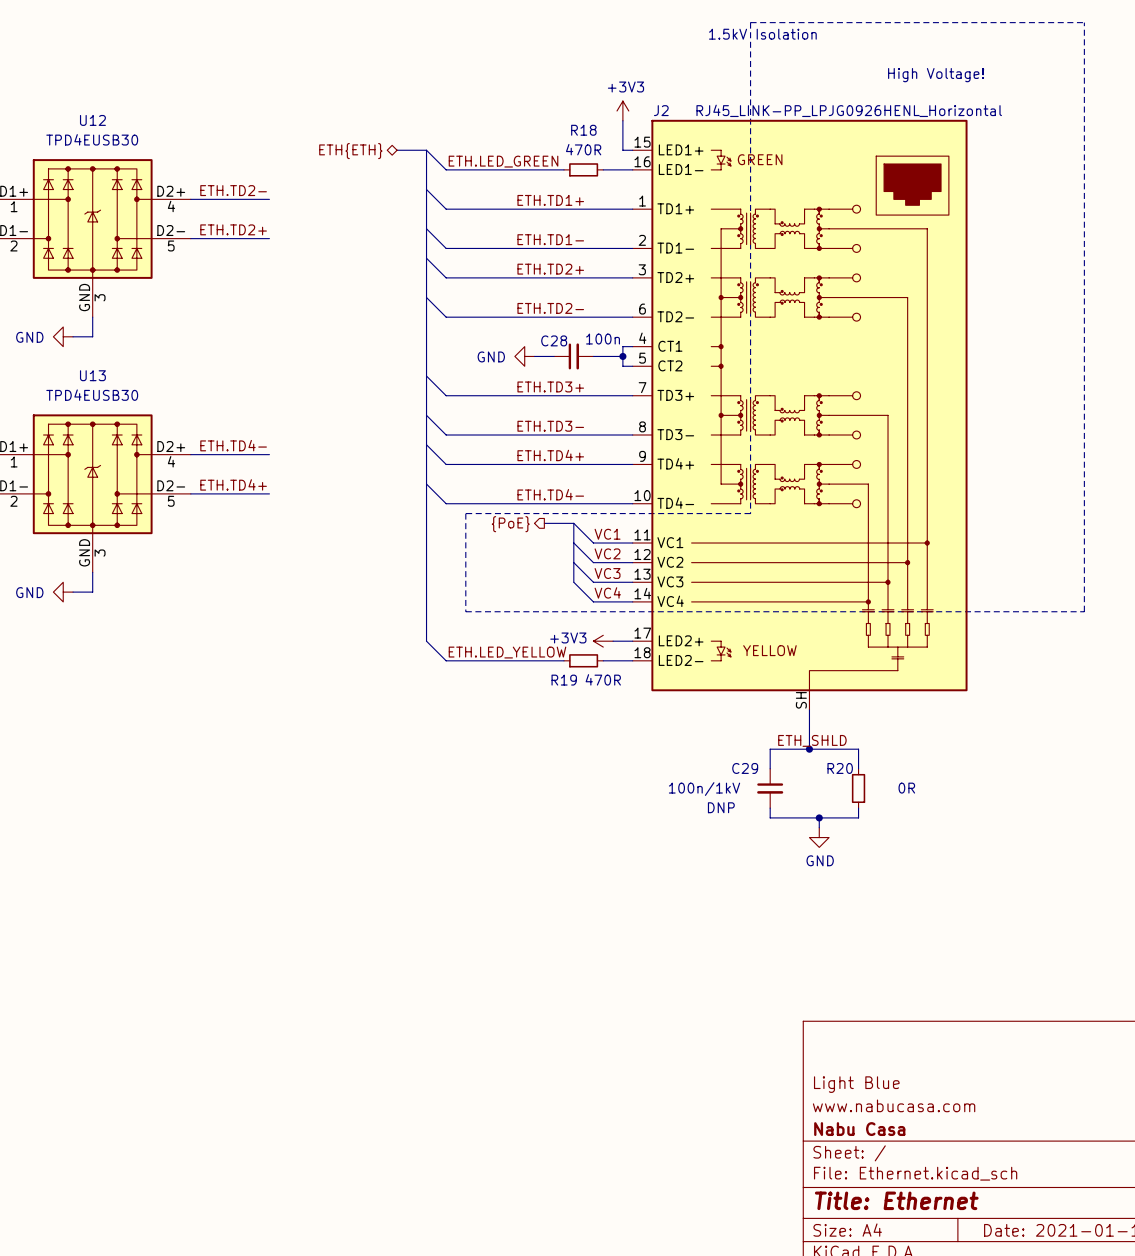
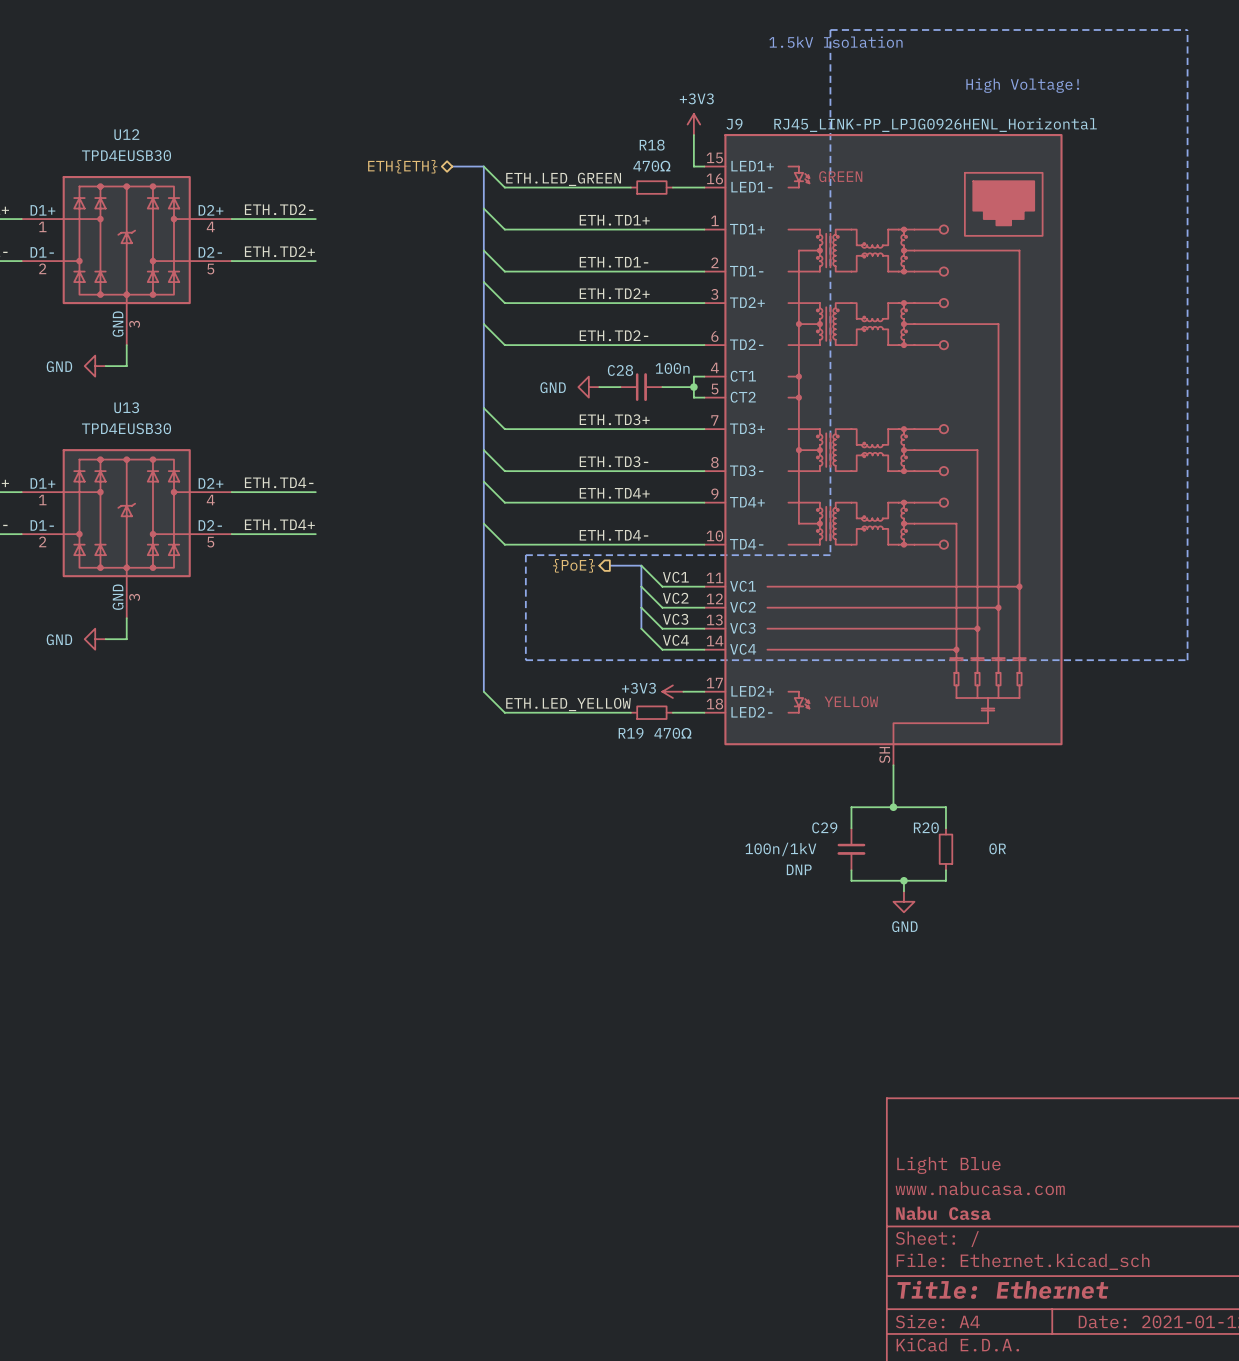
J2 name: J2 (661, 110) -> J9 (734, 124)
R18 value: 470R (583, 149) -> 470Ω (651, 166)
R19 value: 470R (603, 679) -> 470Ω (672, 733)
label: ETH_SHLD (812, 740) -> none

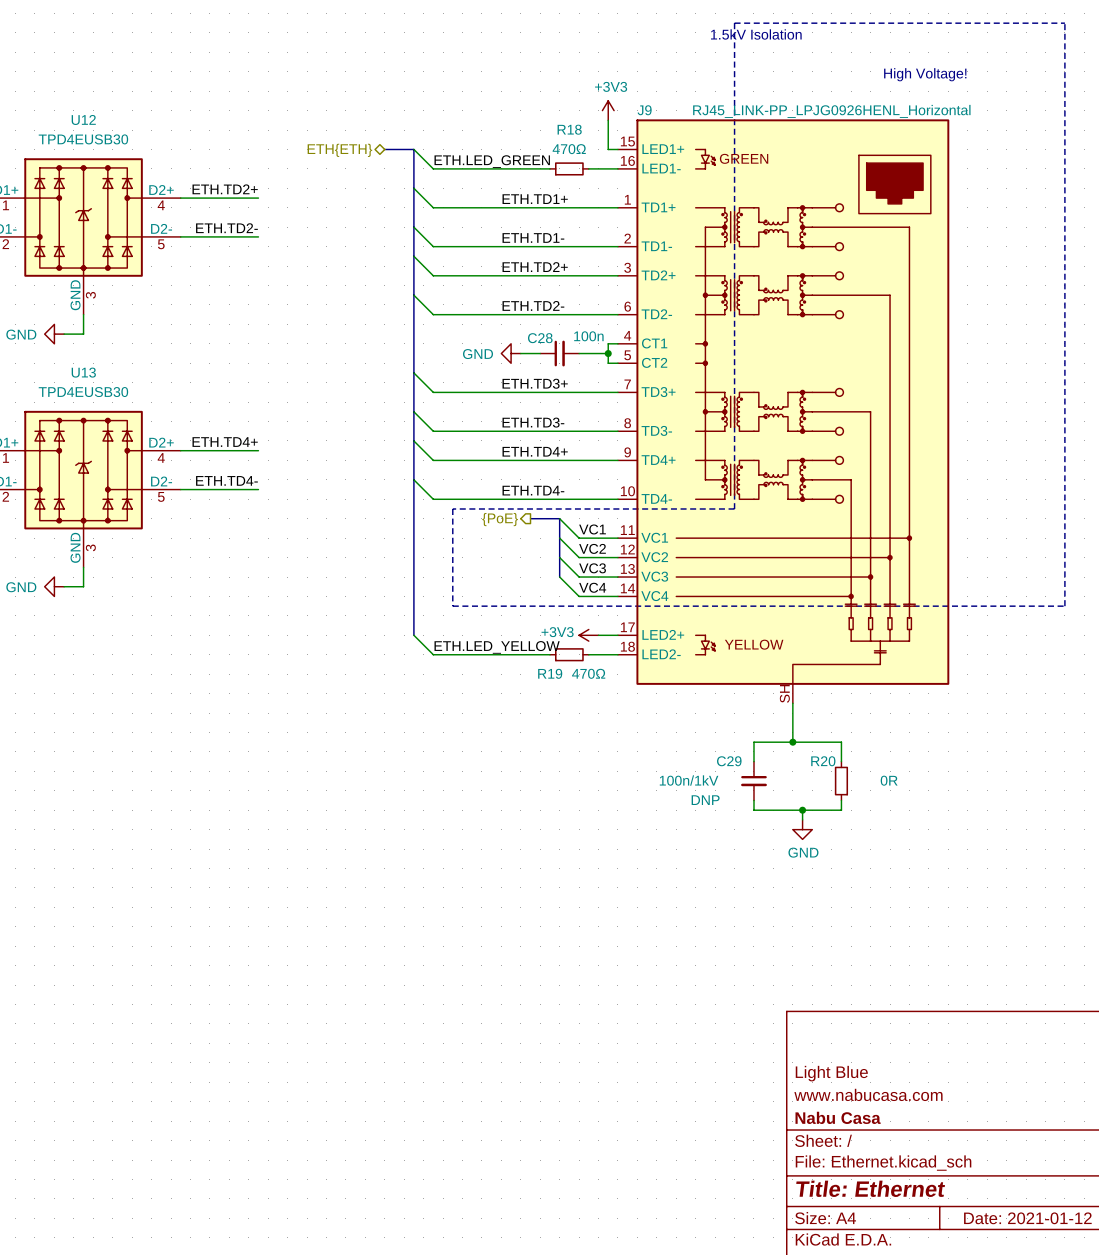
label: ETH.TD2- (279, 209) -> ETH.TD2+ (225, 189)
label: ETH.TD2+ (279, 251) -> ETH.TD2- (226, 228)
label: ETH.TD4- (279, 482) -> ETH.TD4+ (225, 442)
label: ETH.TD4+ (279, 524) -> ETH.TD4- (226, 480)

